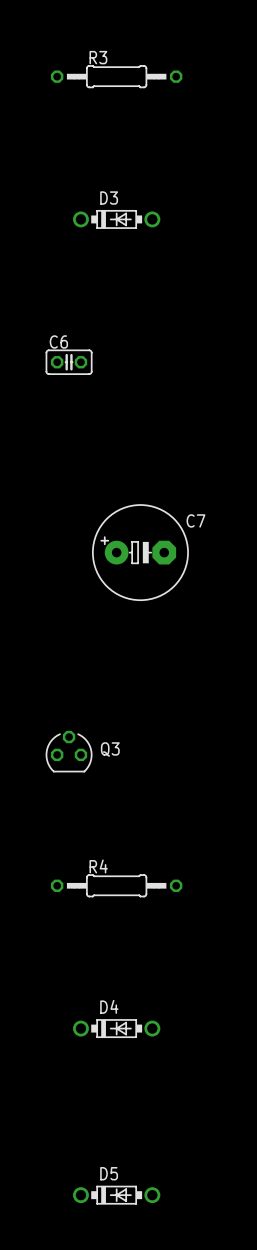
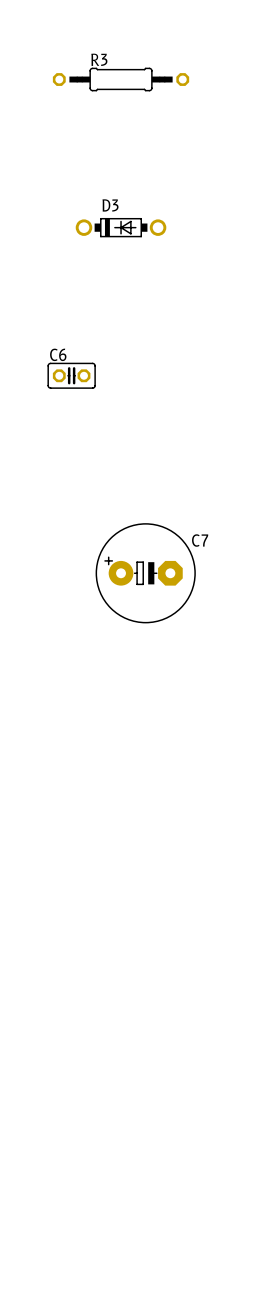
Q3: (69, 751) -> none
R4: (116, 885) -> none
D4: (116, 1028) -> none
D5: (116, 1195) -> none

